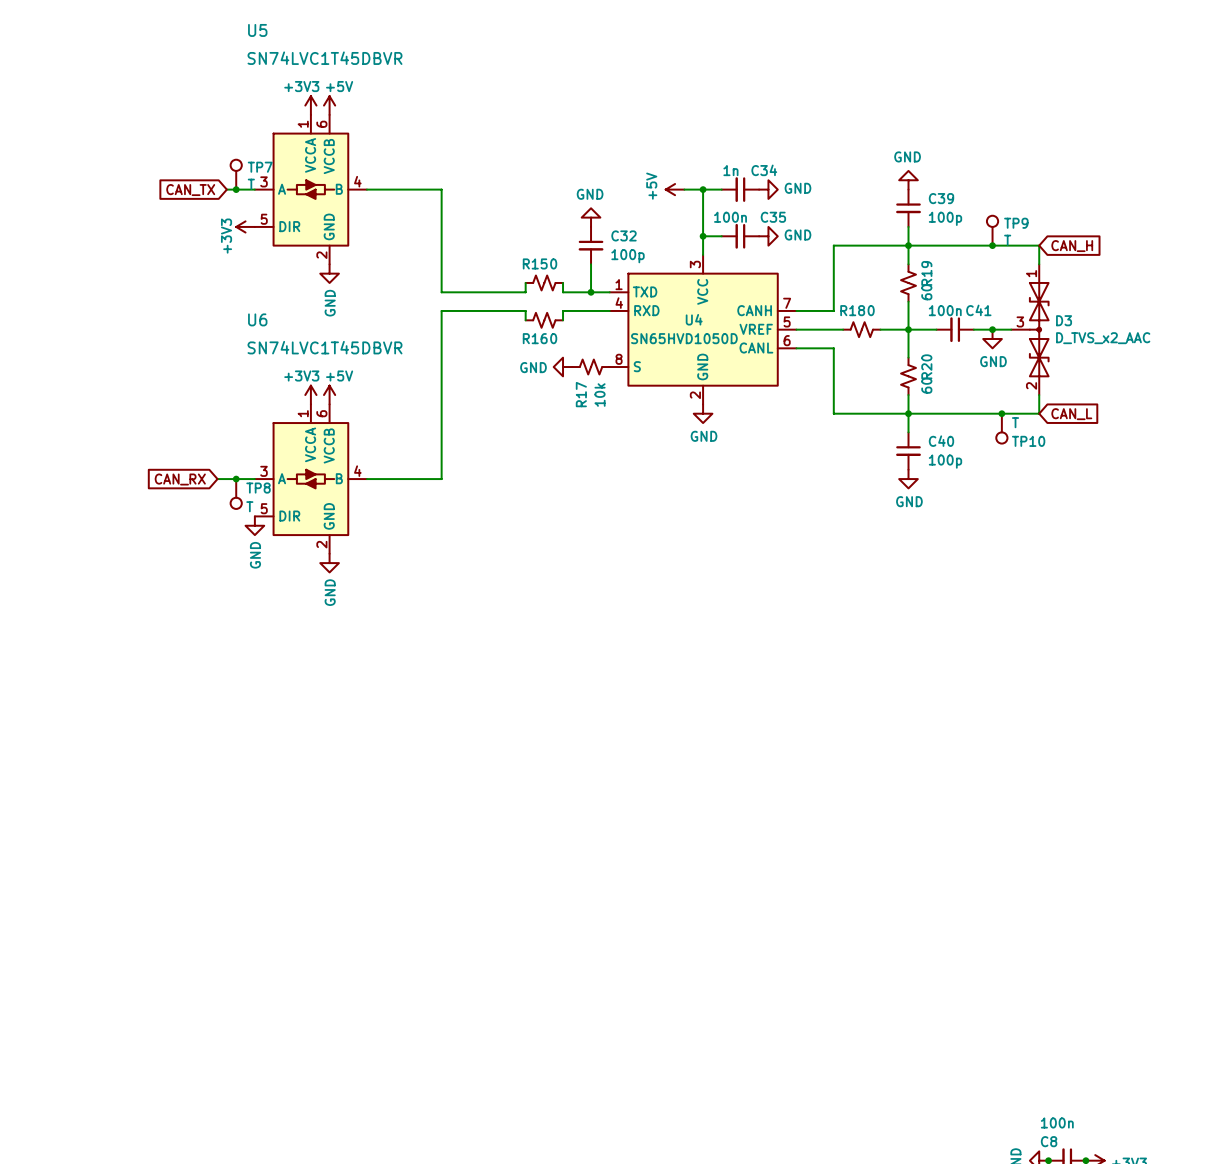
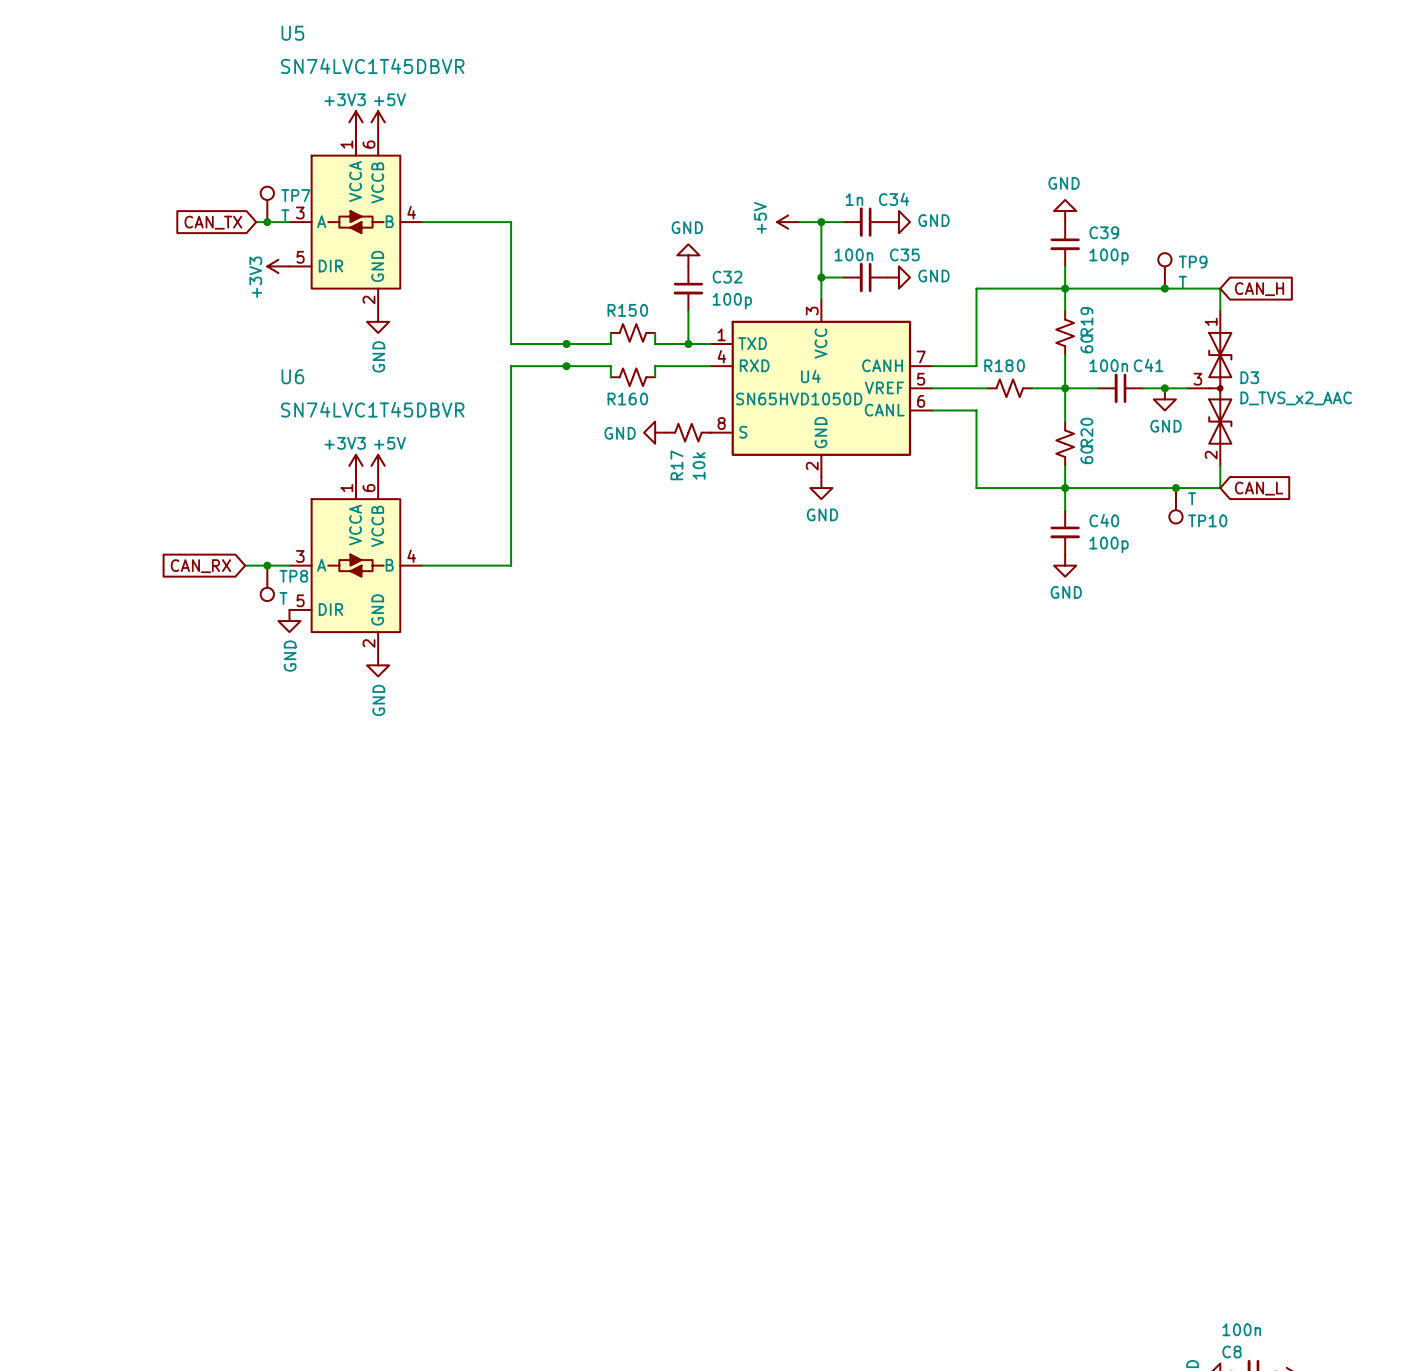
junction: none -> (566, 344)
junction: none -> (566, 366)

